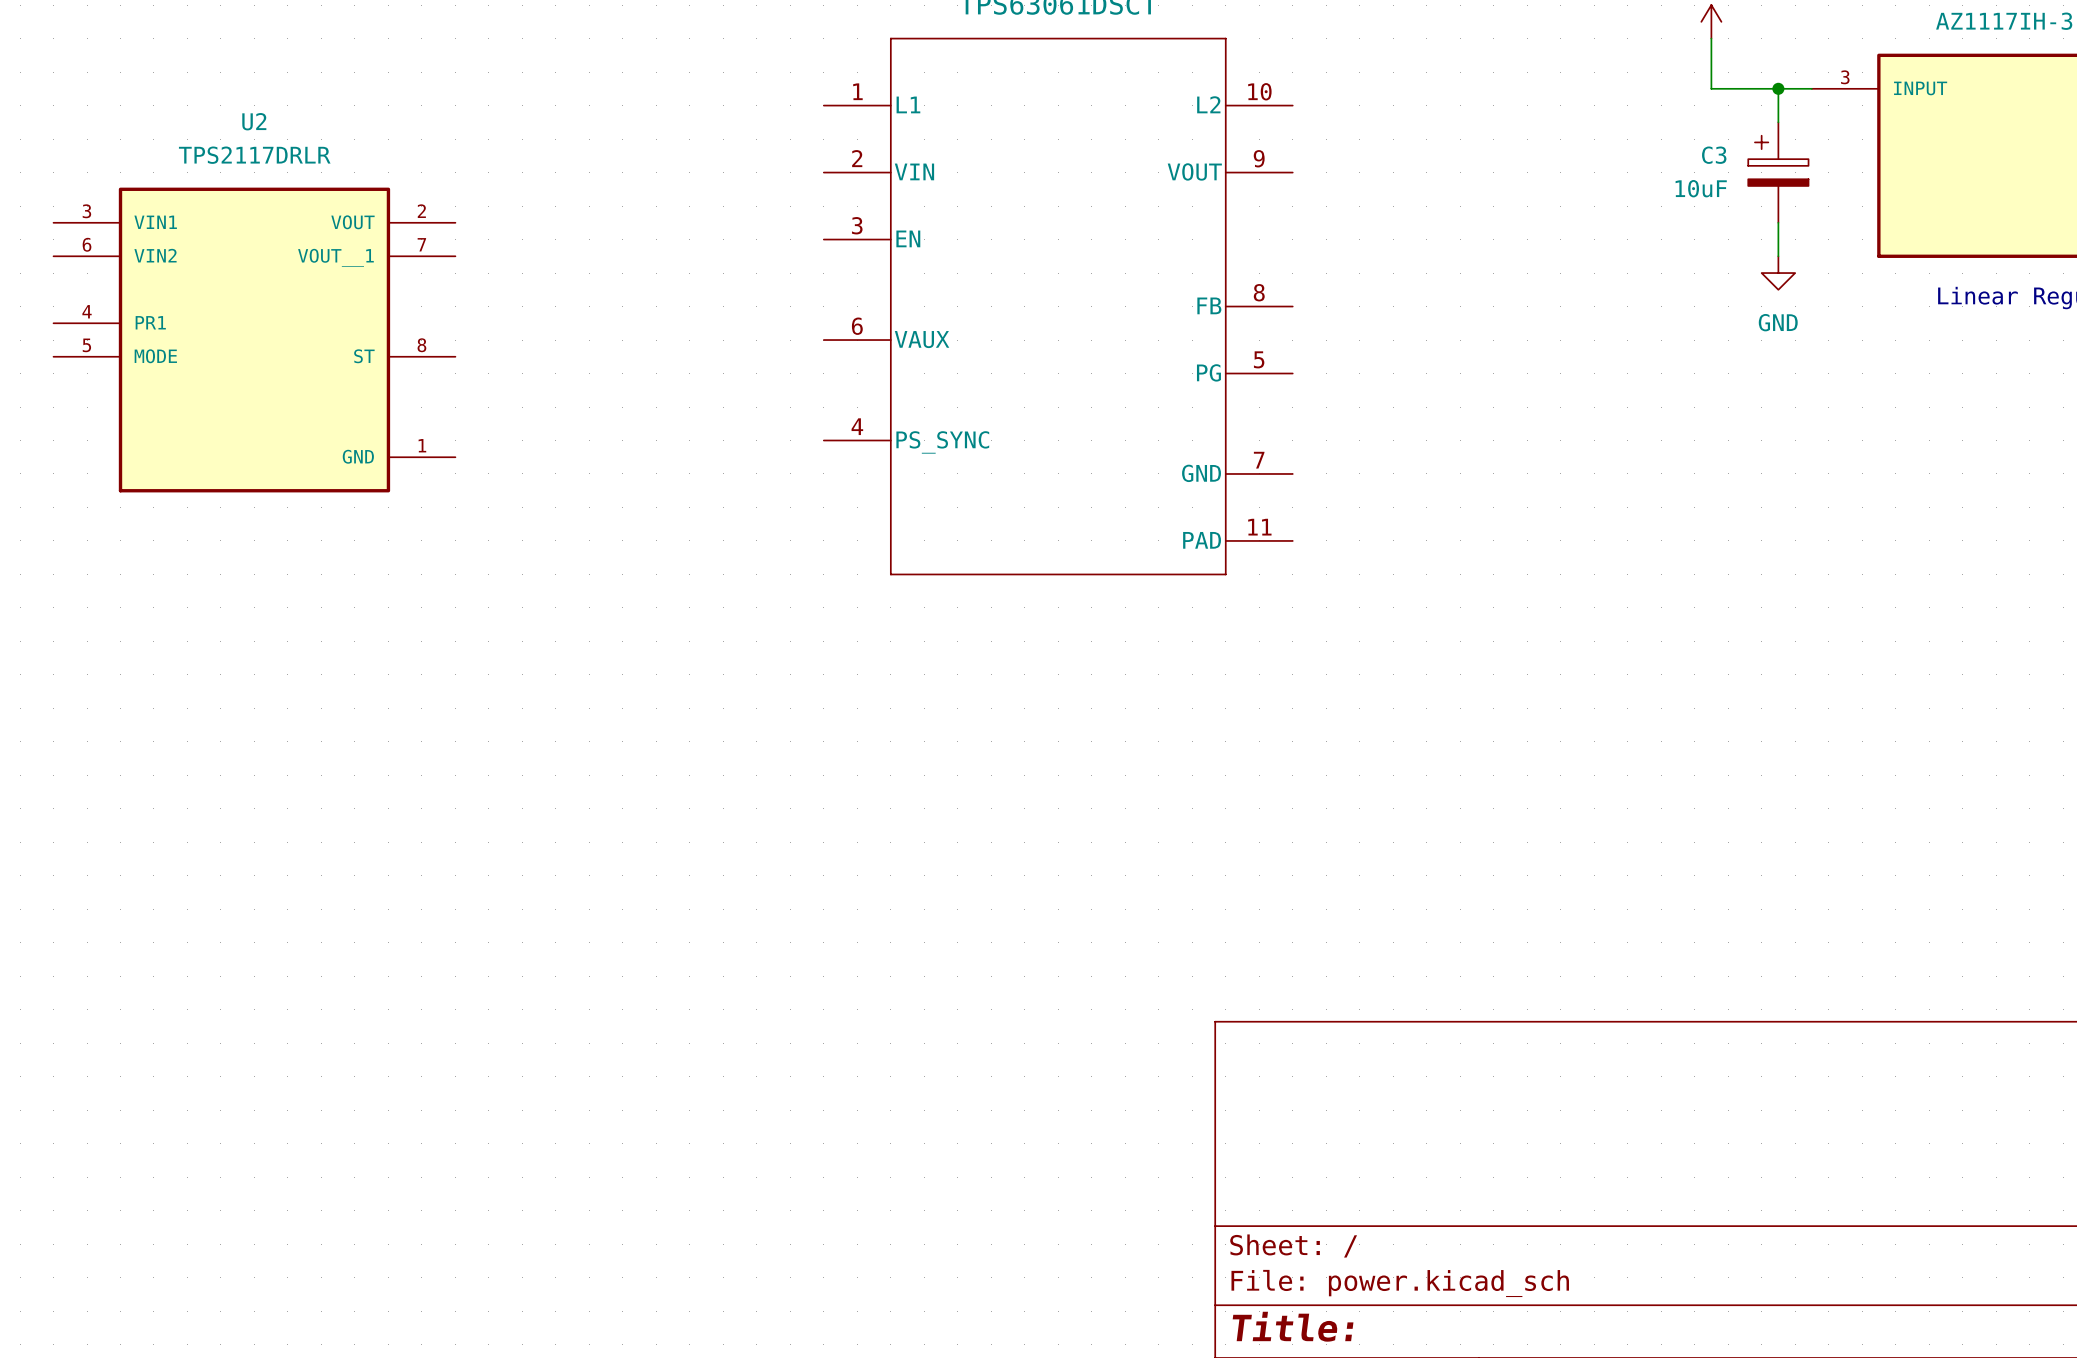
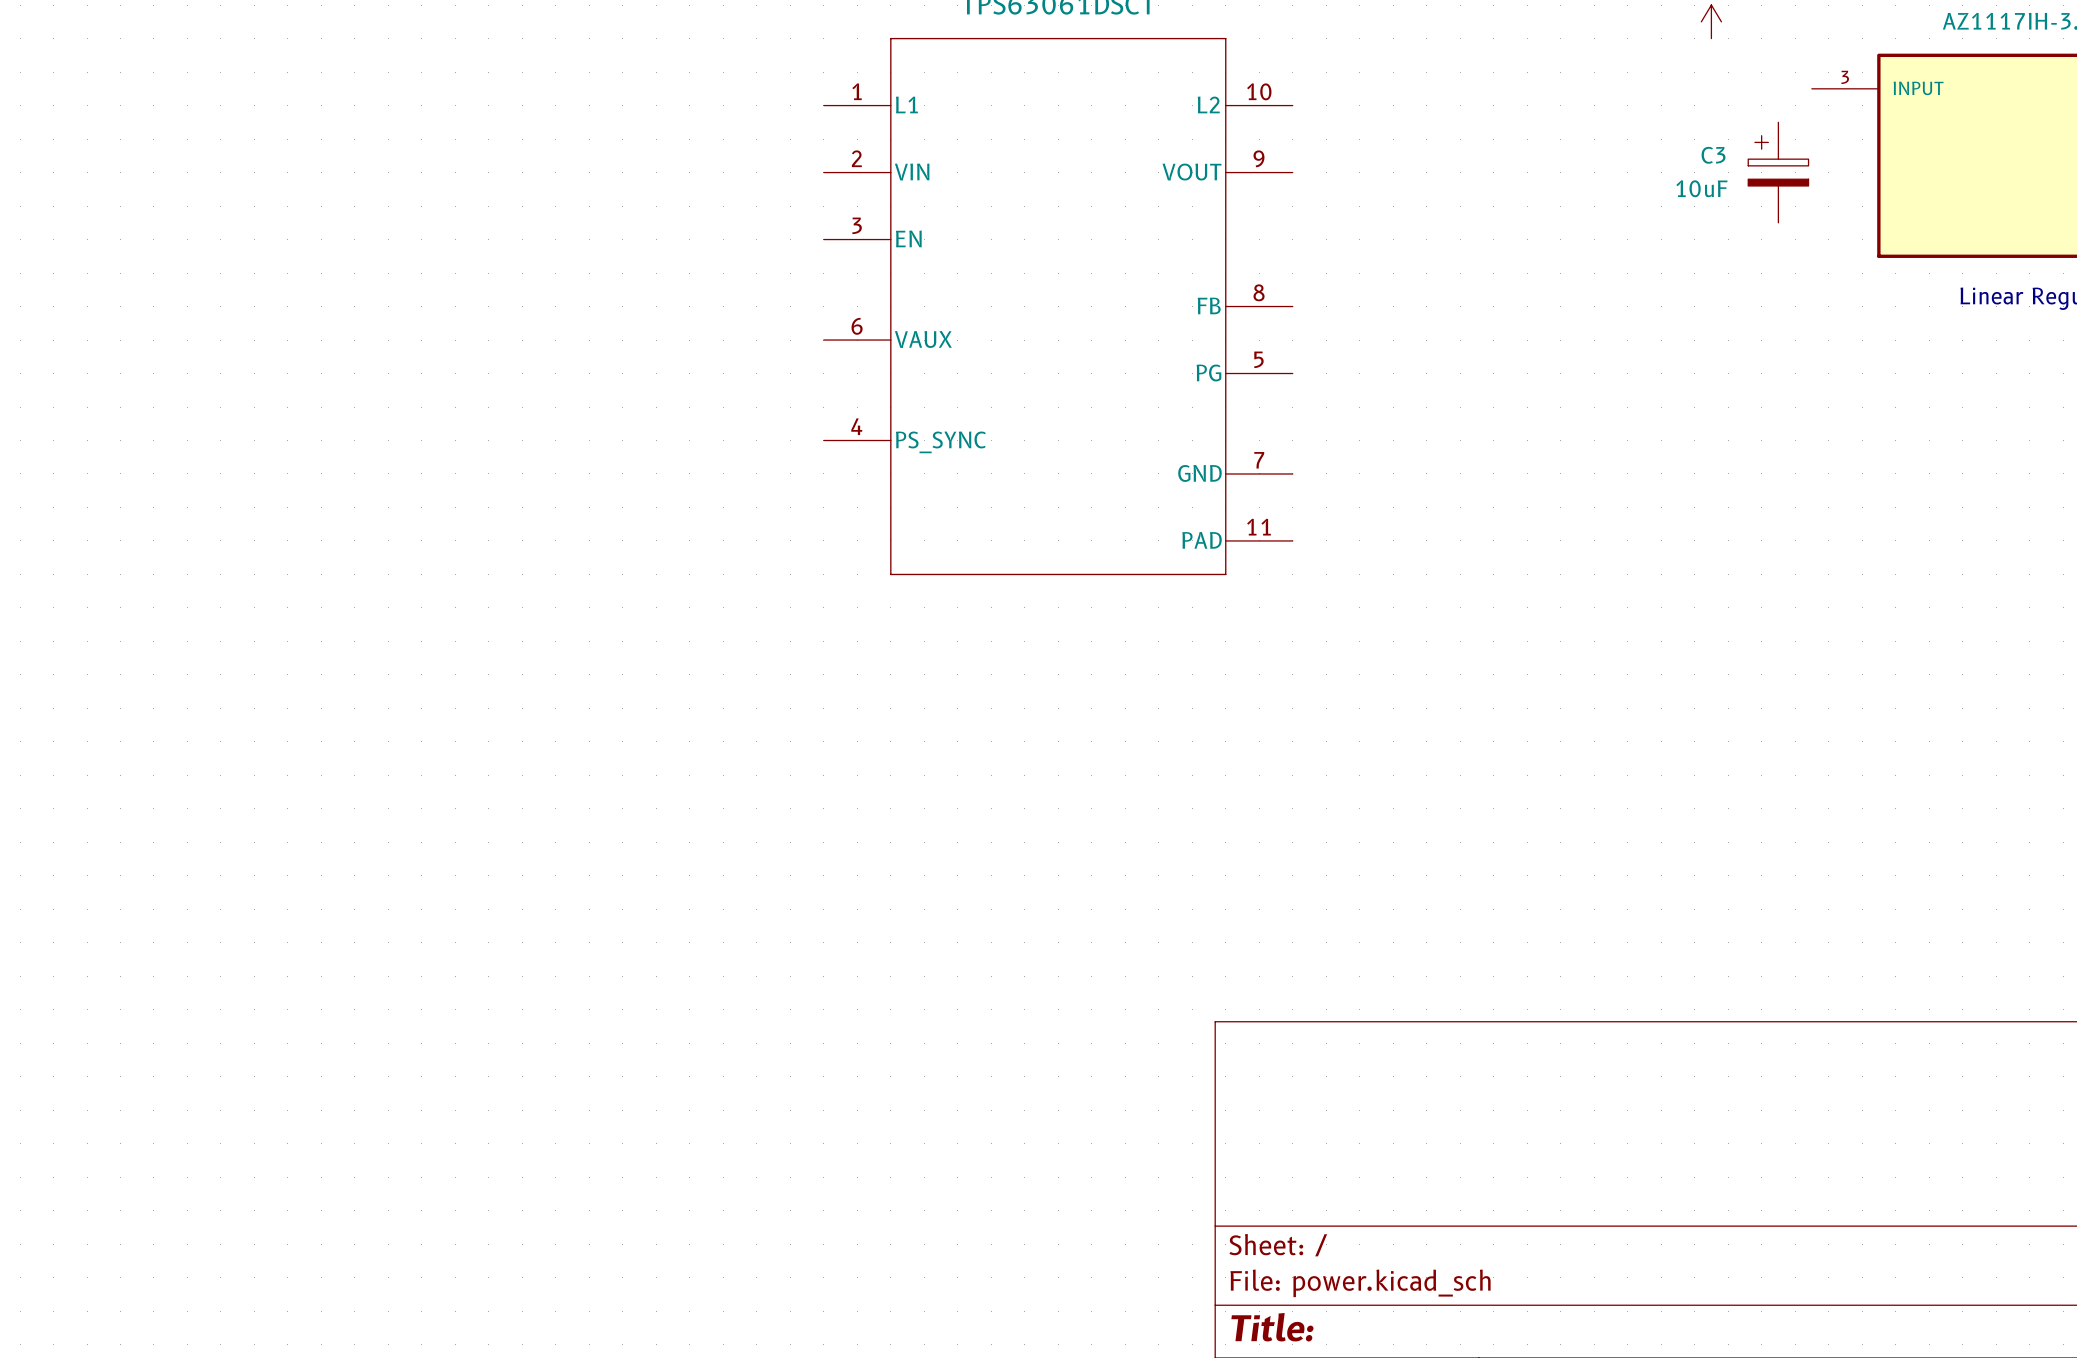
wire: (1711, 38) (1711, 88) (1811, 88) -> none
wire: (1778, 88) (1778, 122) -> none
junction: (1778, 88) -> none
wire: (1778, 222) (1778, 256) -> none
power symbol: GND (1778, 273) -> none
U2: TPS2117DRLR (254, 340) -> none

